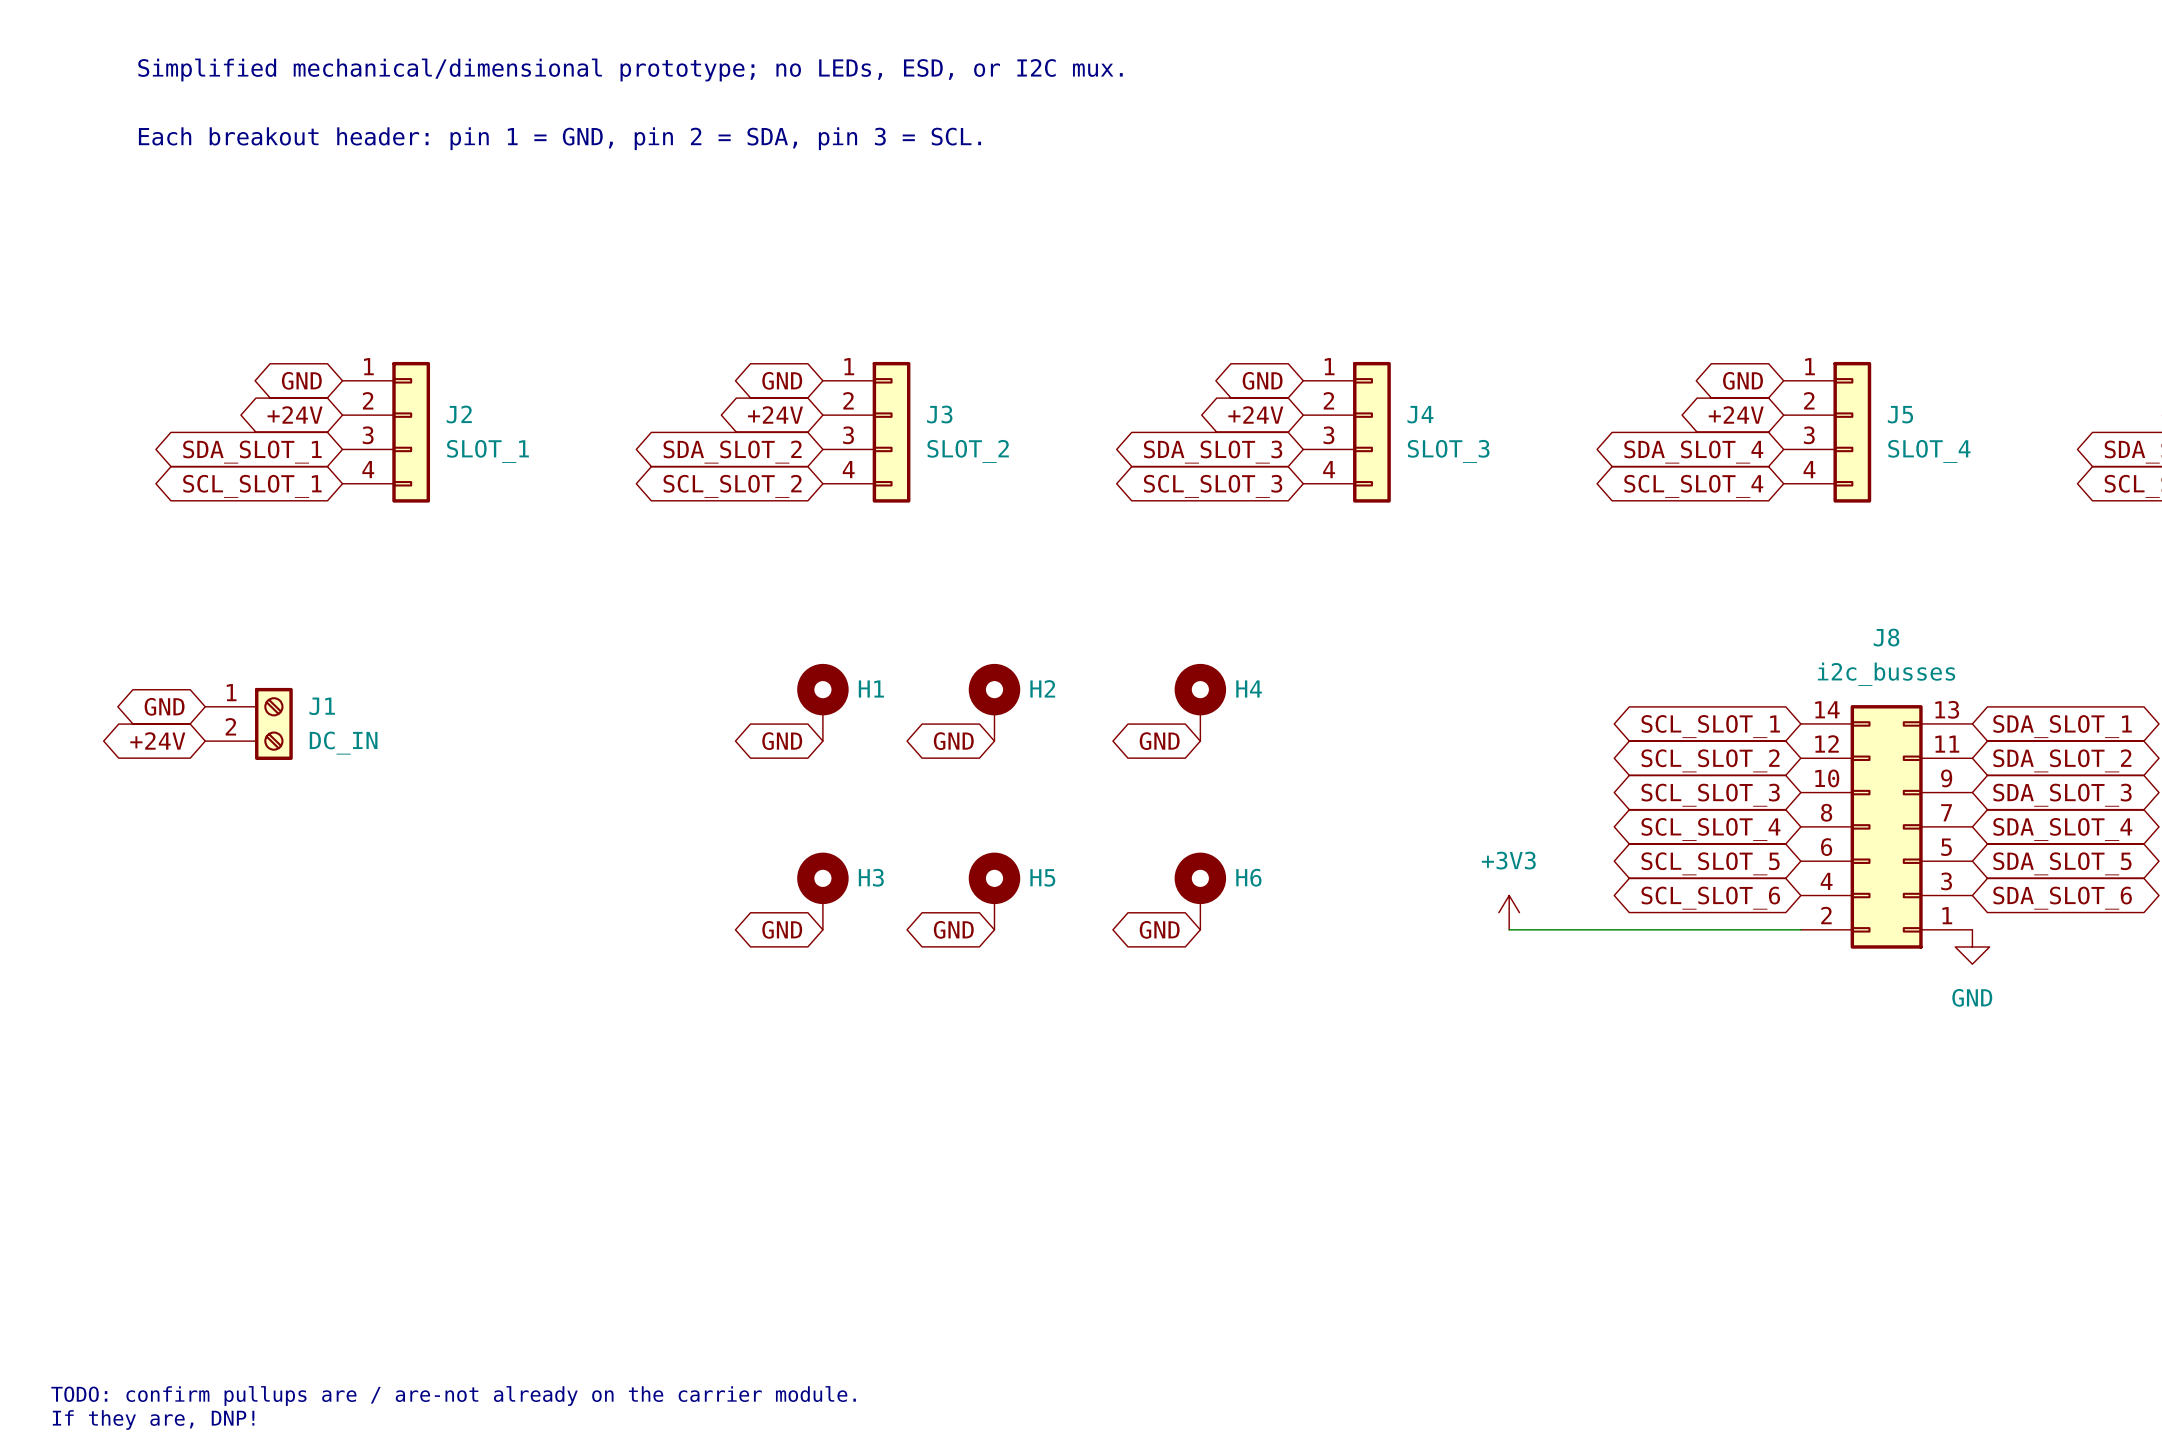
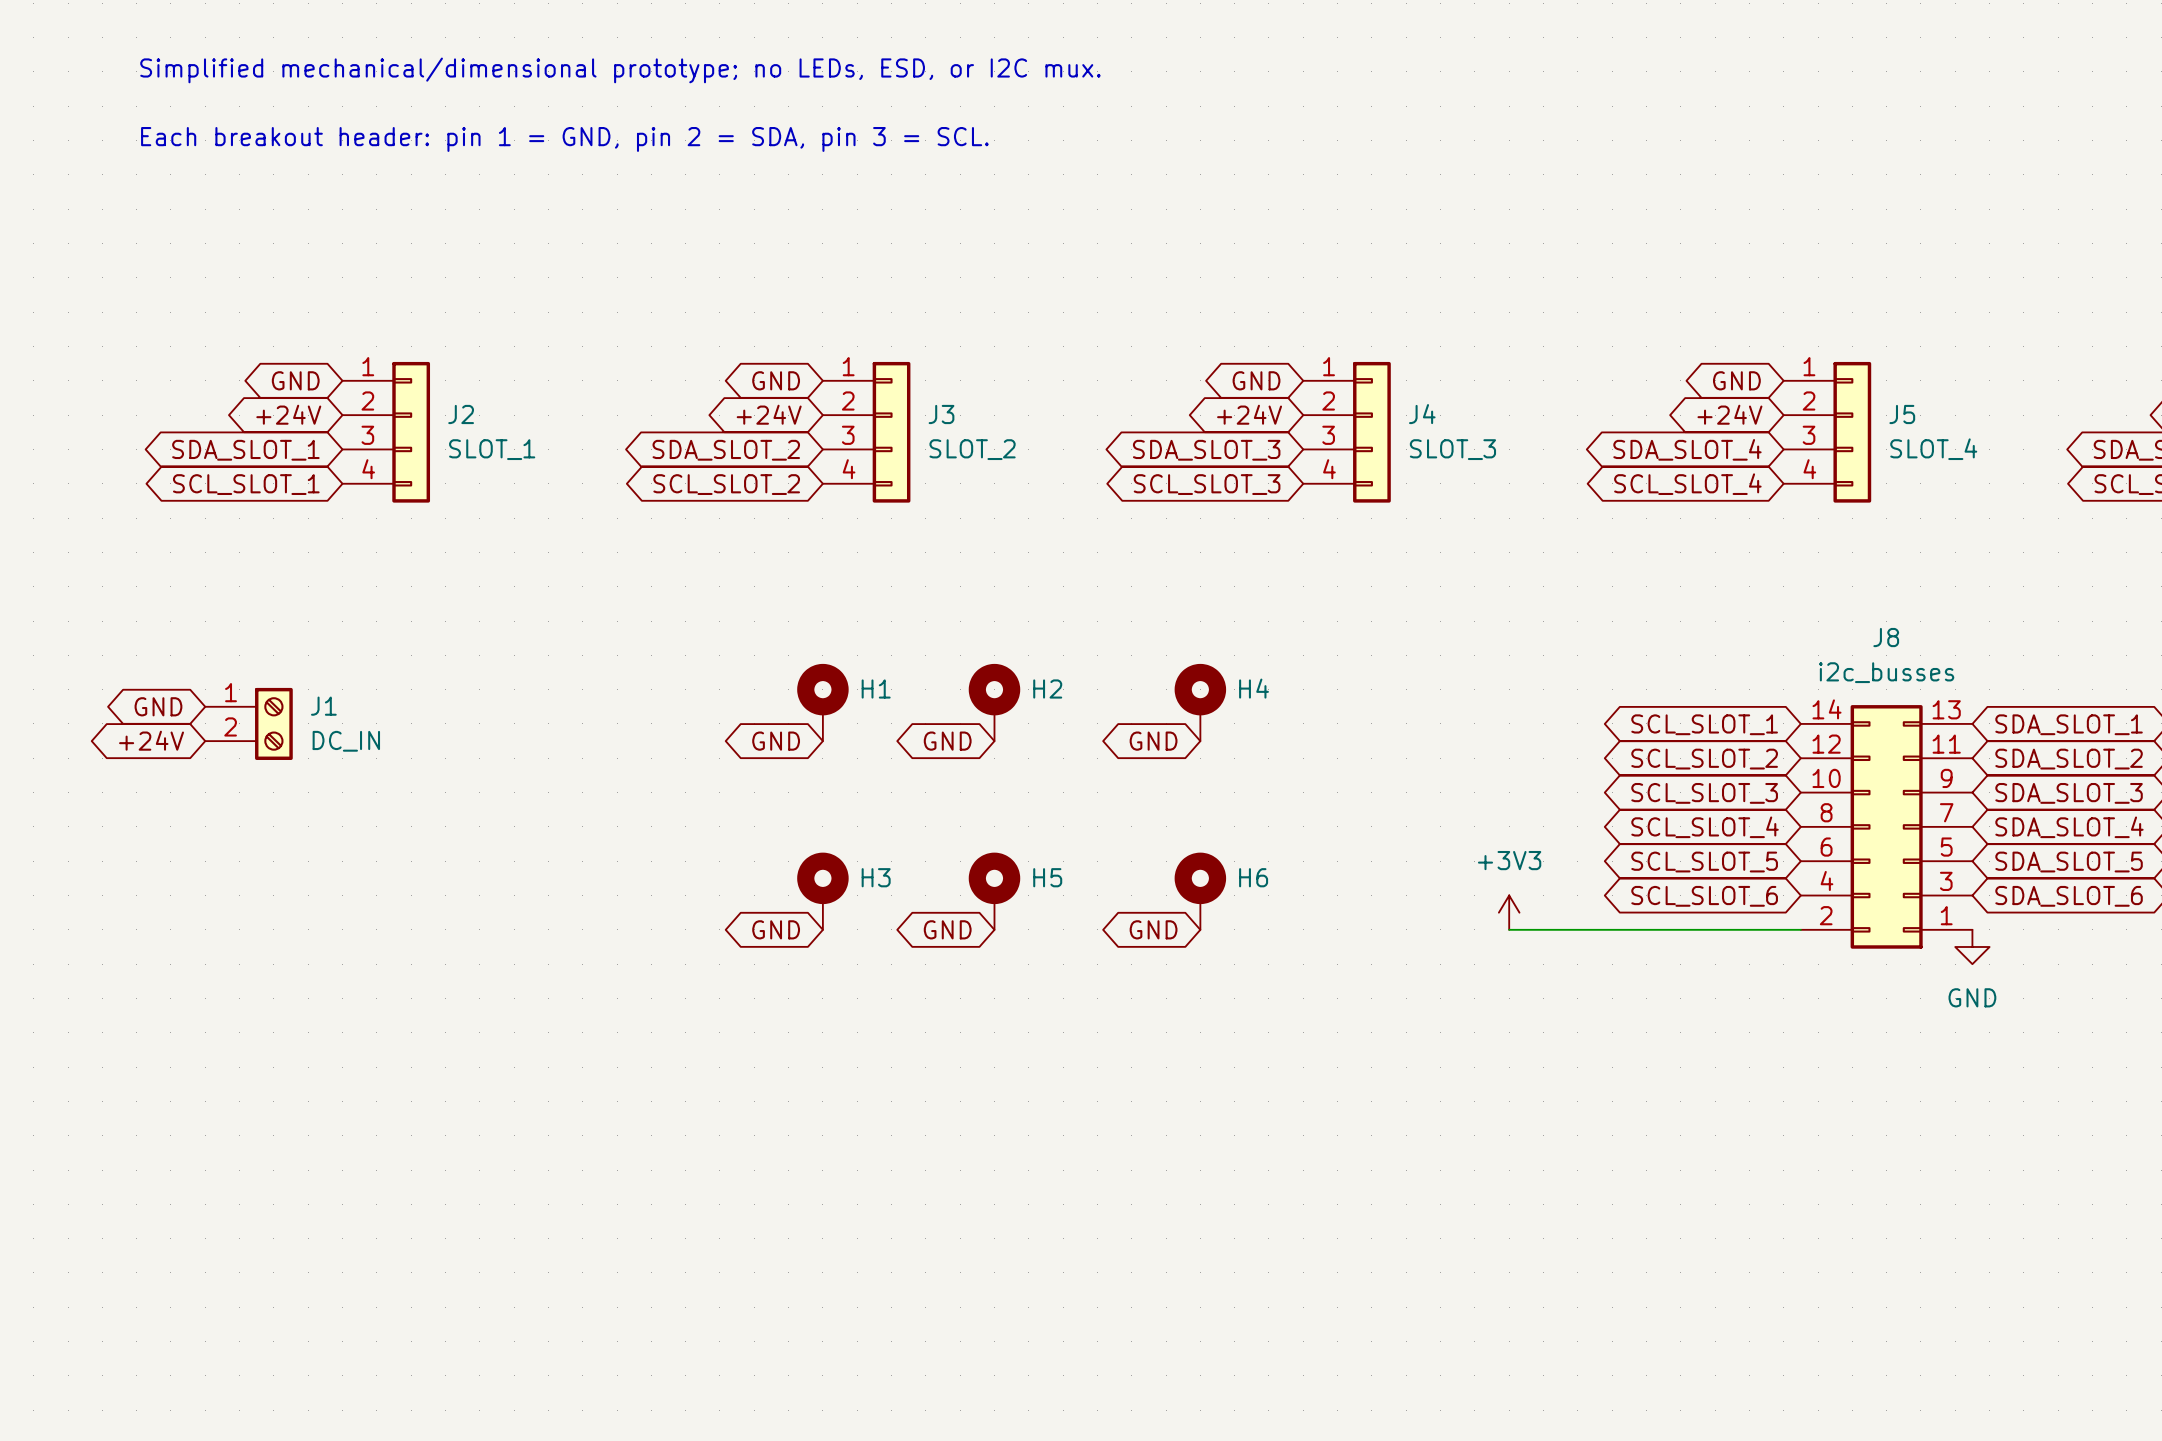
text: TODO: confirm pullups are / are-not already on the carrier module. (453, 1396) -> none
text: If they are, DNP! (153, 1419) -> none

